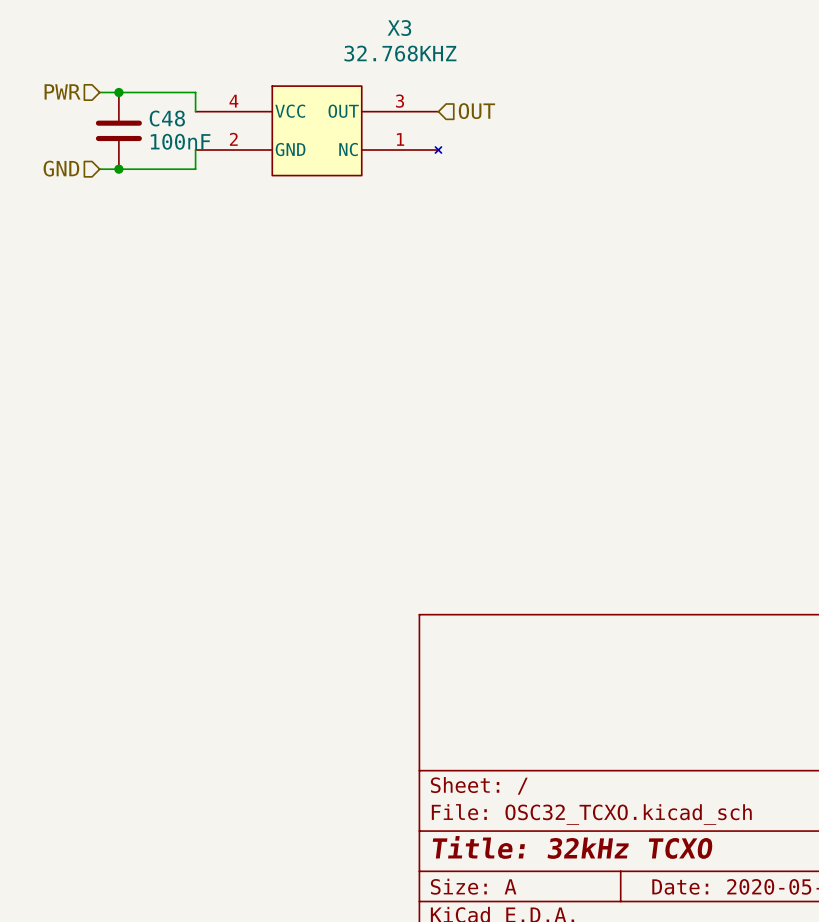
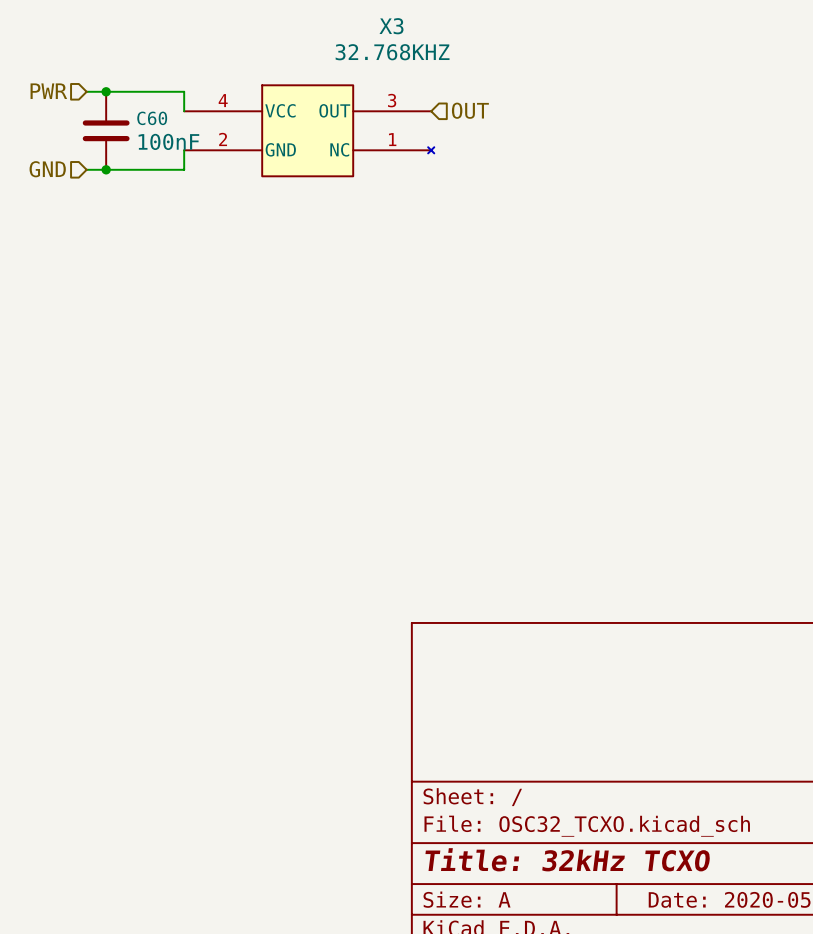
C48 name: C48 (167, 118) -> C60 (152, 118)

